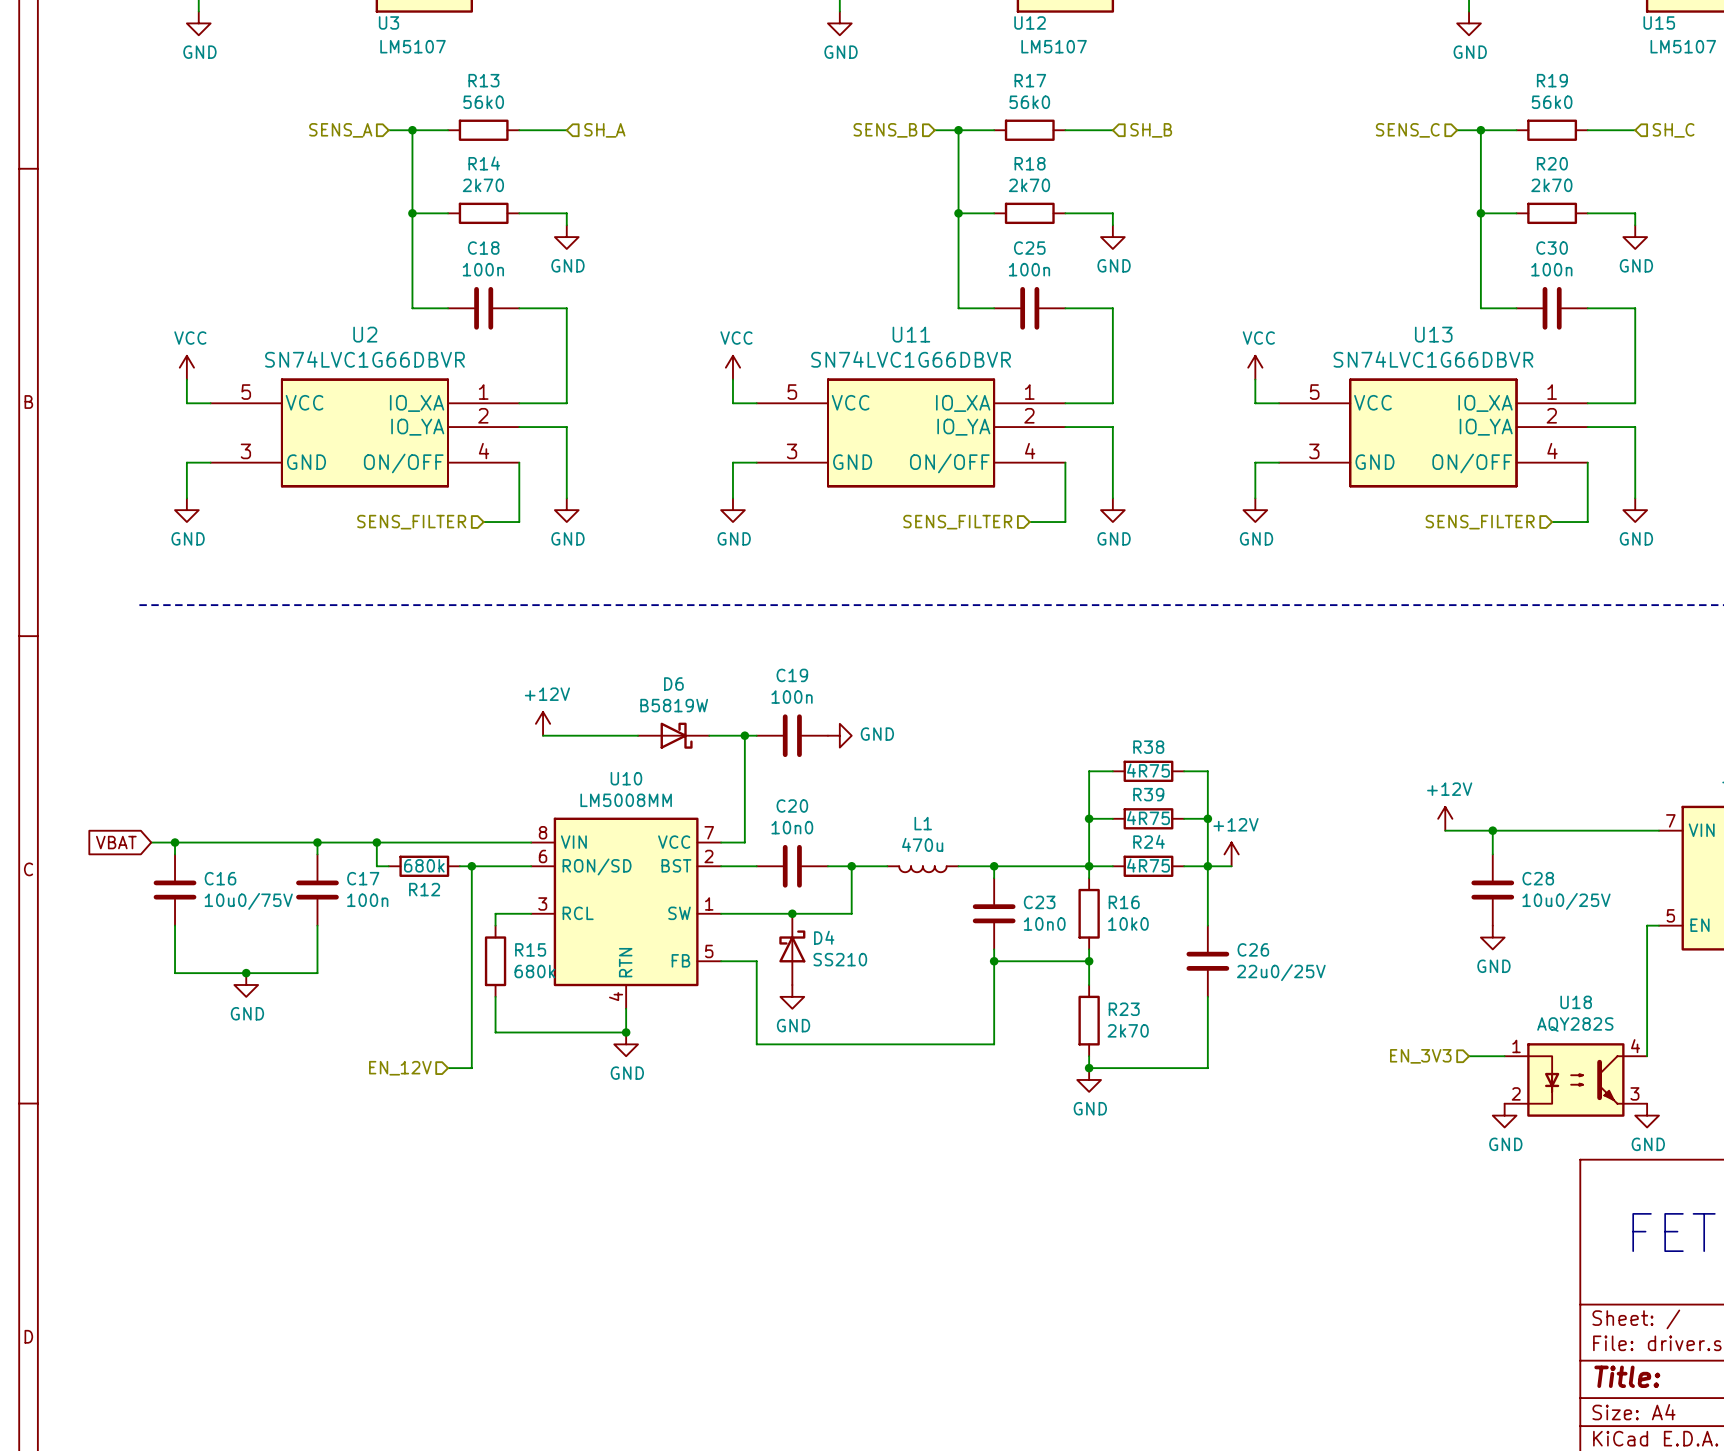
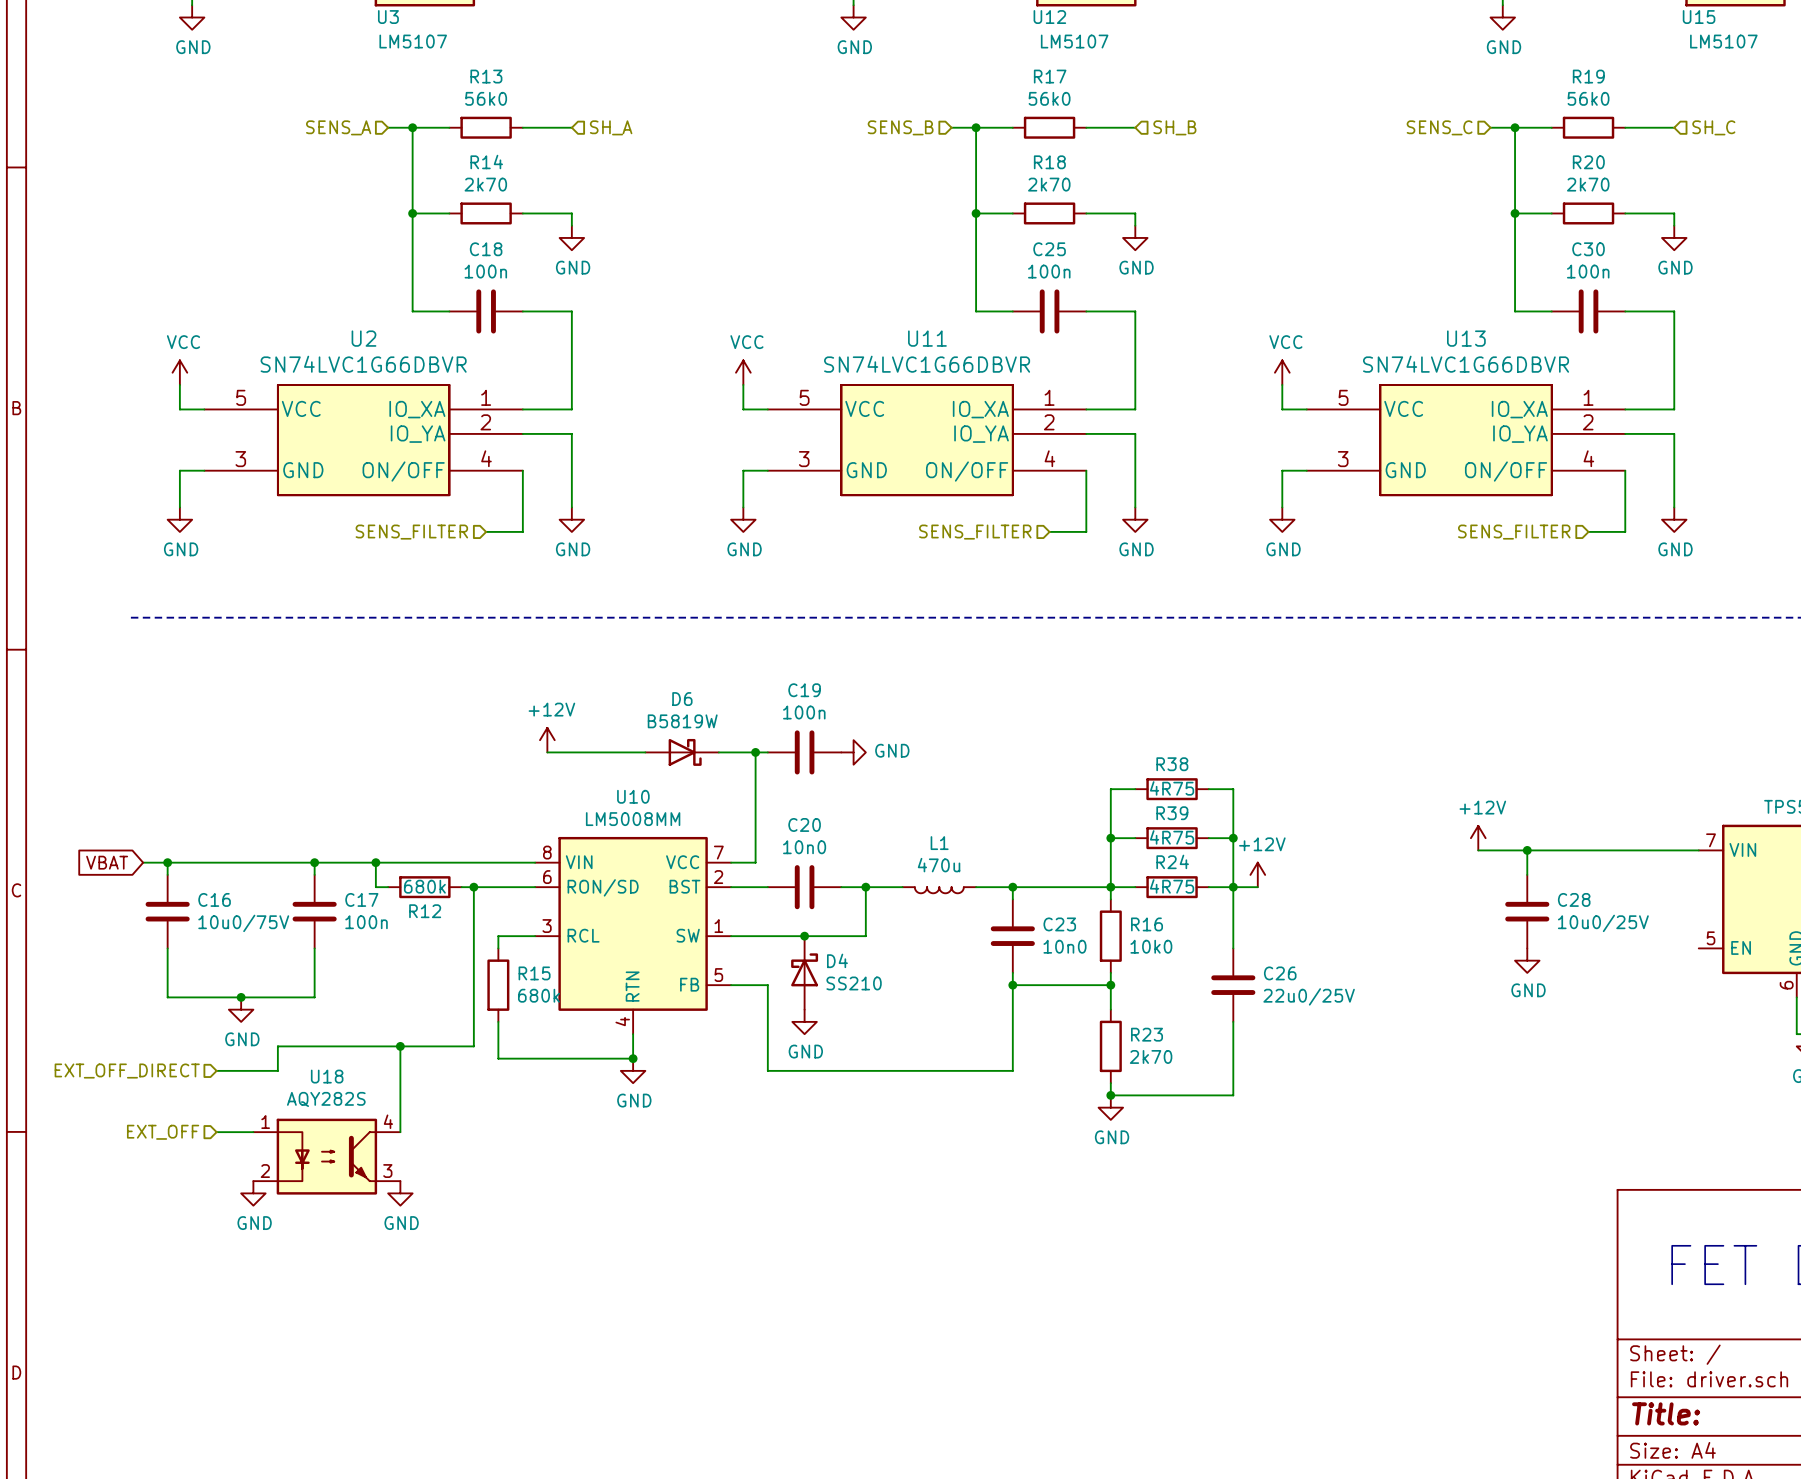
wire: (1658, 925) (1647, 925) (1647, 1056) -> none
wire: none -> (400, 1046) (400, 1132)
junction: none -> (400, 1046)
wire: (471, 1020) (471, 1068) (448, 1068) -> (473, 1046) (277, 1046) (277, 1070) (216, 1070)
hierarchical label: none -> EXT_OFF_DIRECT (127, 1071)
hierarchical label: EN_3V3 (1420, 1056) -> none
wire: (1469, 1056) (1504, 1056) -> none
hierarchical label: EN_12V (400, 1068) -> none
U18 position: (1575, 1079) -> (326, 1156)
hierarchical label: none -> EXT_OFF (163, 1132)
wire: none -> (216, 1132) (253, 1132)
power symbol: GND (1504, 1115) -> none
power symbol: GND (1647, 1115) -> none
power symbol: none -> GND (253, 1193)
power symbol: none -> GND (400, 1193)

